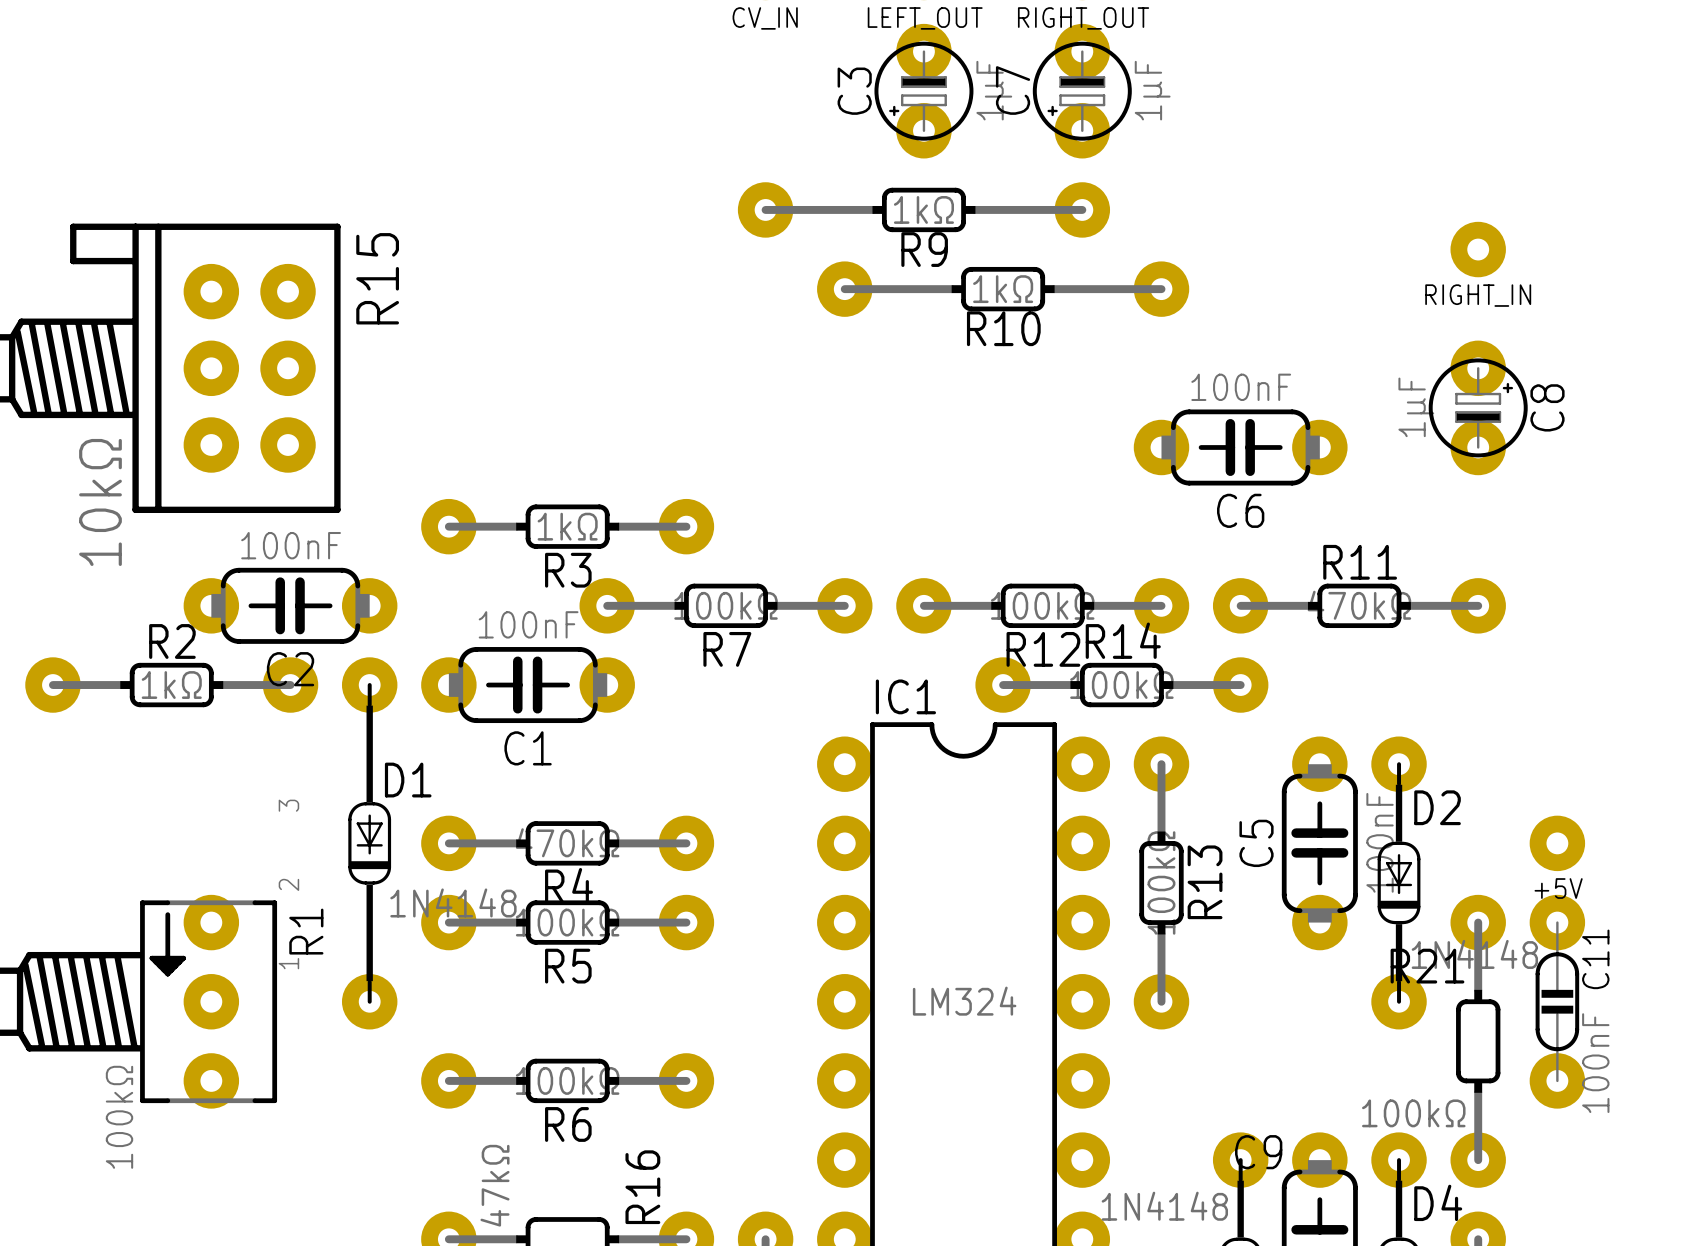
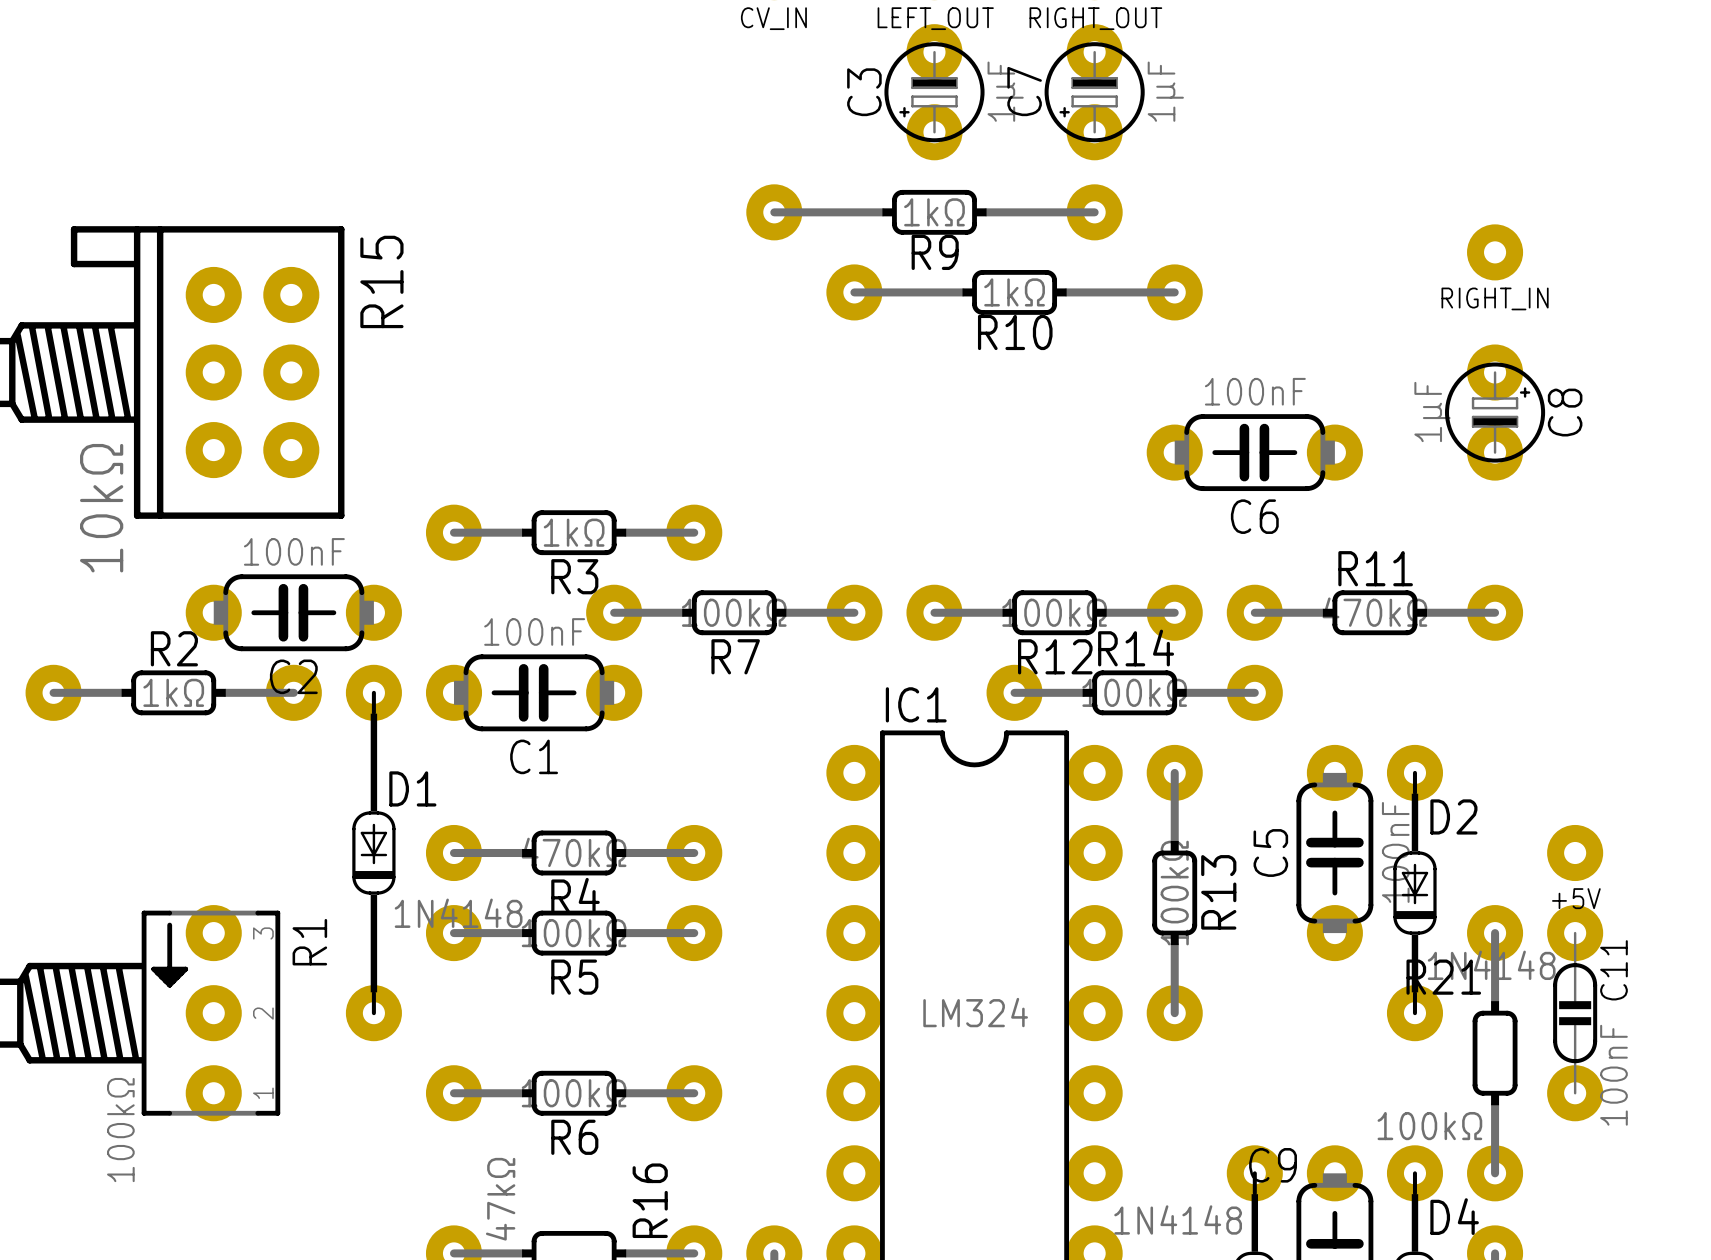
R1 text: 3 (288, 805) -> none
R1 text: 2 (288, 884) -> none
R1 text: none -> 3 (263, 933)
R1 text: 1 (288, 963) -> none
R1 text: none -> 2 (263, 1013)
R1 text: none -> 1 (263, 1093)

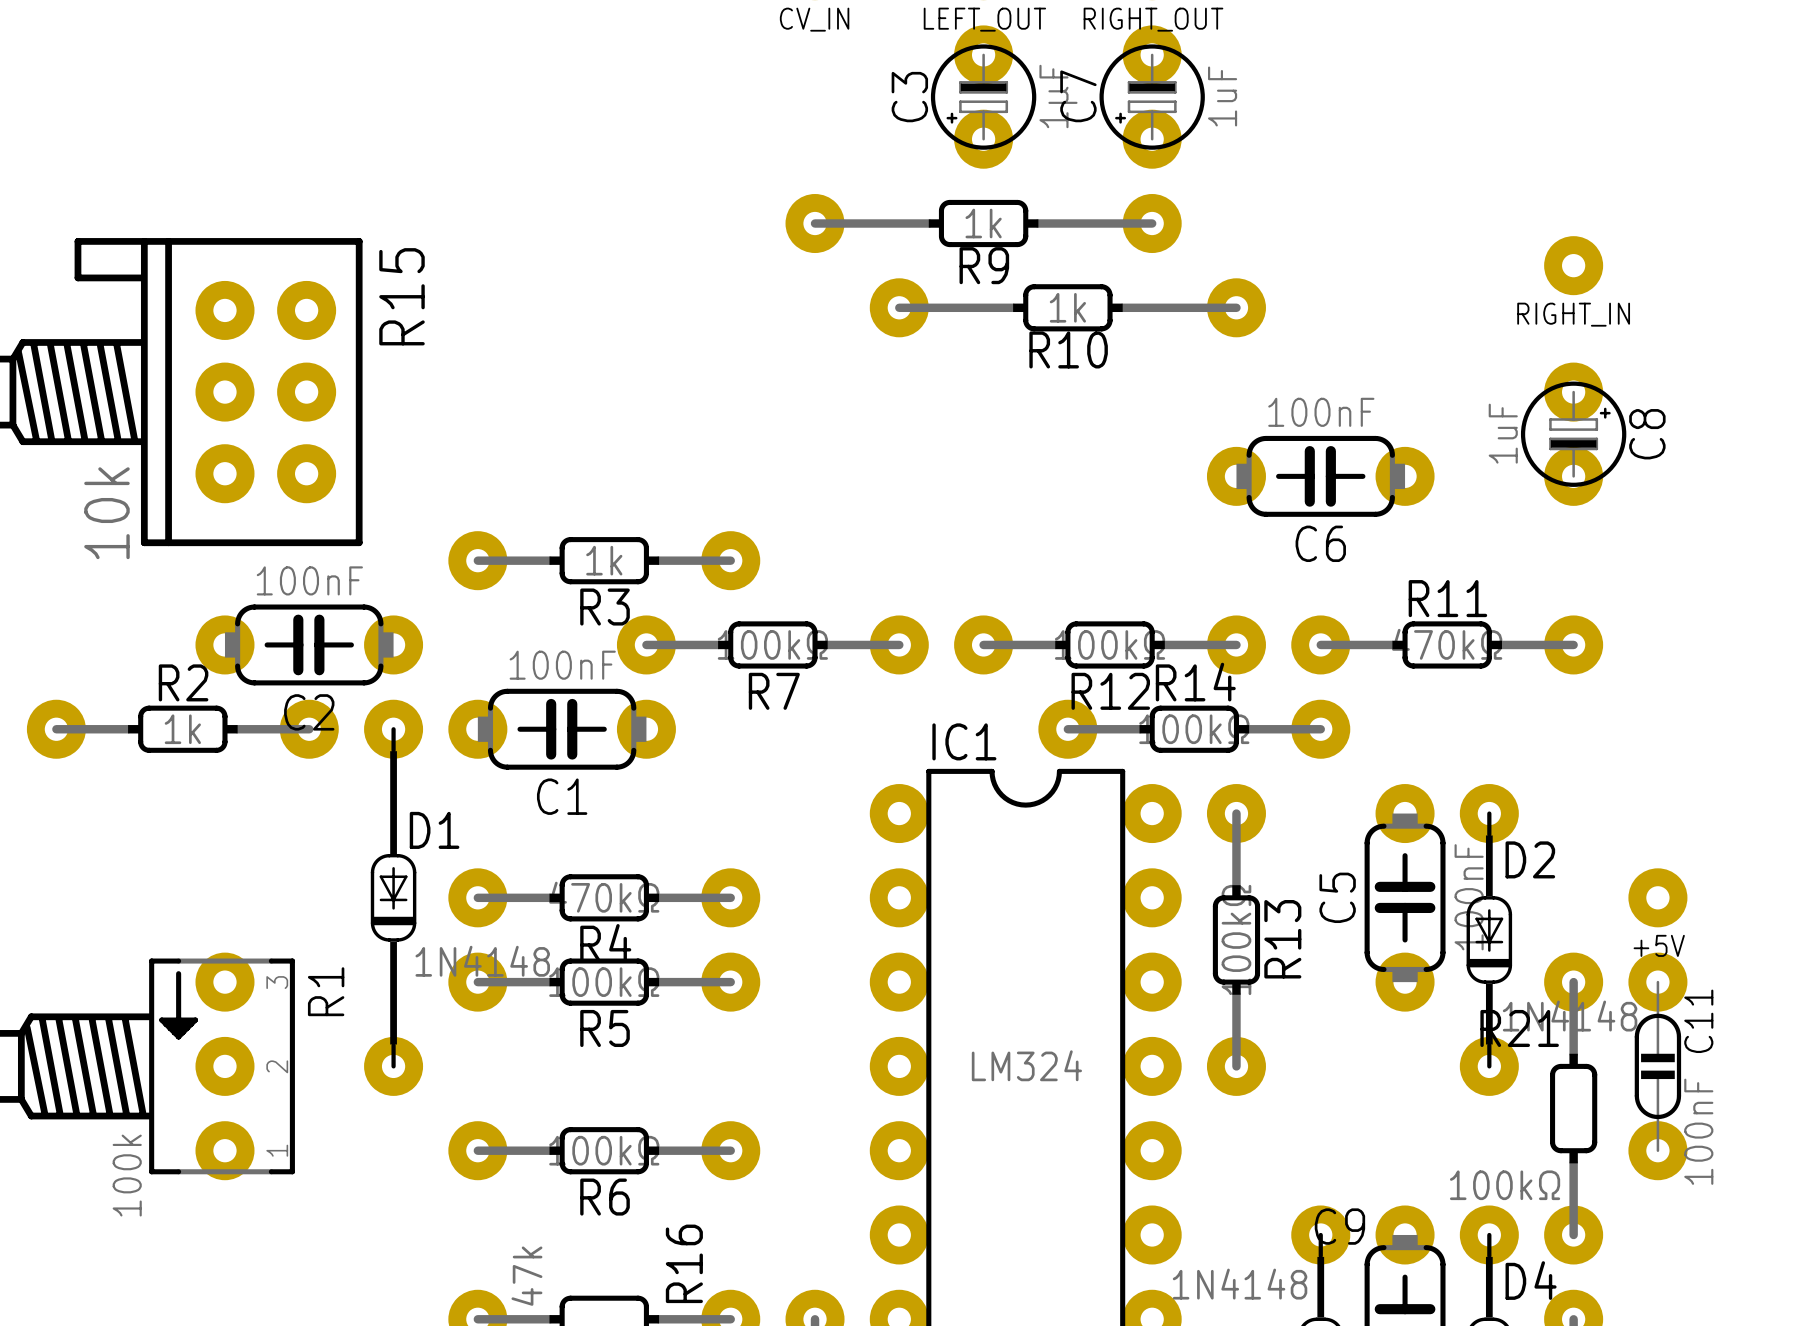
C7 value: 1μF (1165, 91) -> 1uF (1222, 96)
R9 value: 1kΩ (934, 212) -> 1k (983, 223)
R10 value: 1kΩ (1014, 292) -> 1k (1067, 307)
C8 value: 1μF (1432, 412) -> 1uF (1503, 433)
R15 value: 10kΩ (101, 508) -> 10k (106, 513)
R3 value: 1kΩ (574, 532) -> 1k (604, 560)
R2 value: 1kΩ (173, 692) -> 1k (182, 729)
R1 value: 100kΩ (120, 1130) -> 100k (127, 1175)
R16 value: 47kΩ (500, 1199) -> 47k (526, 1276)

